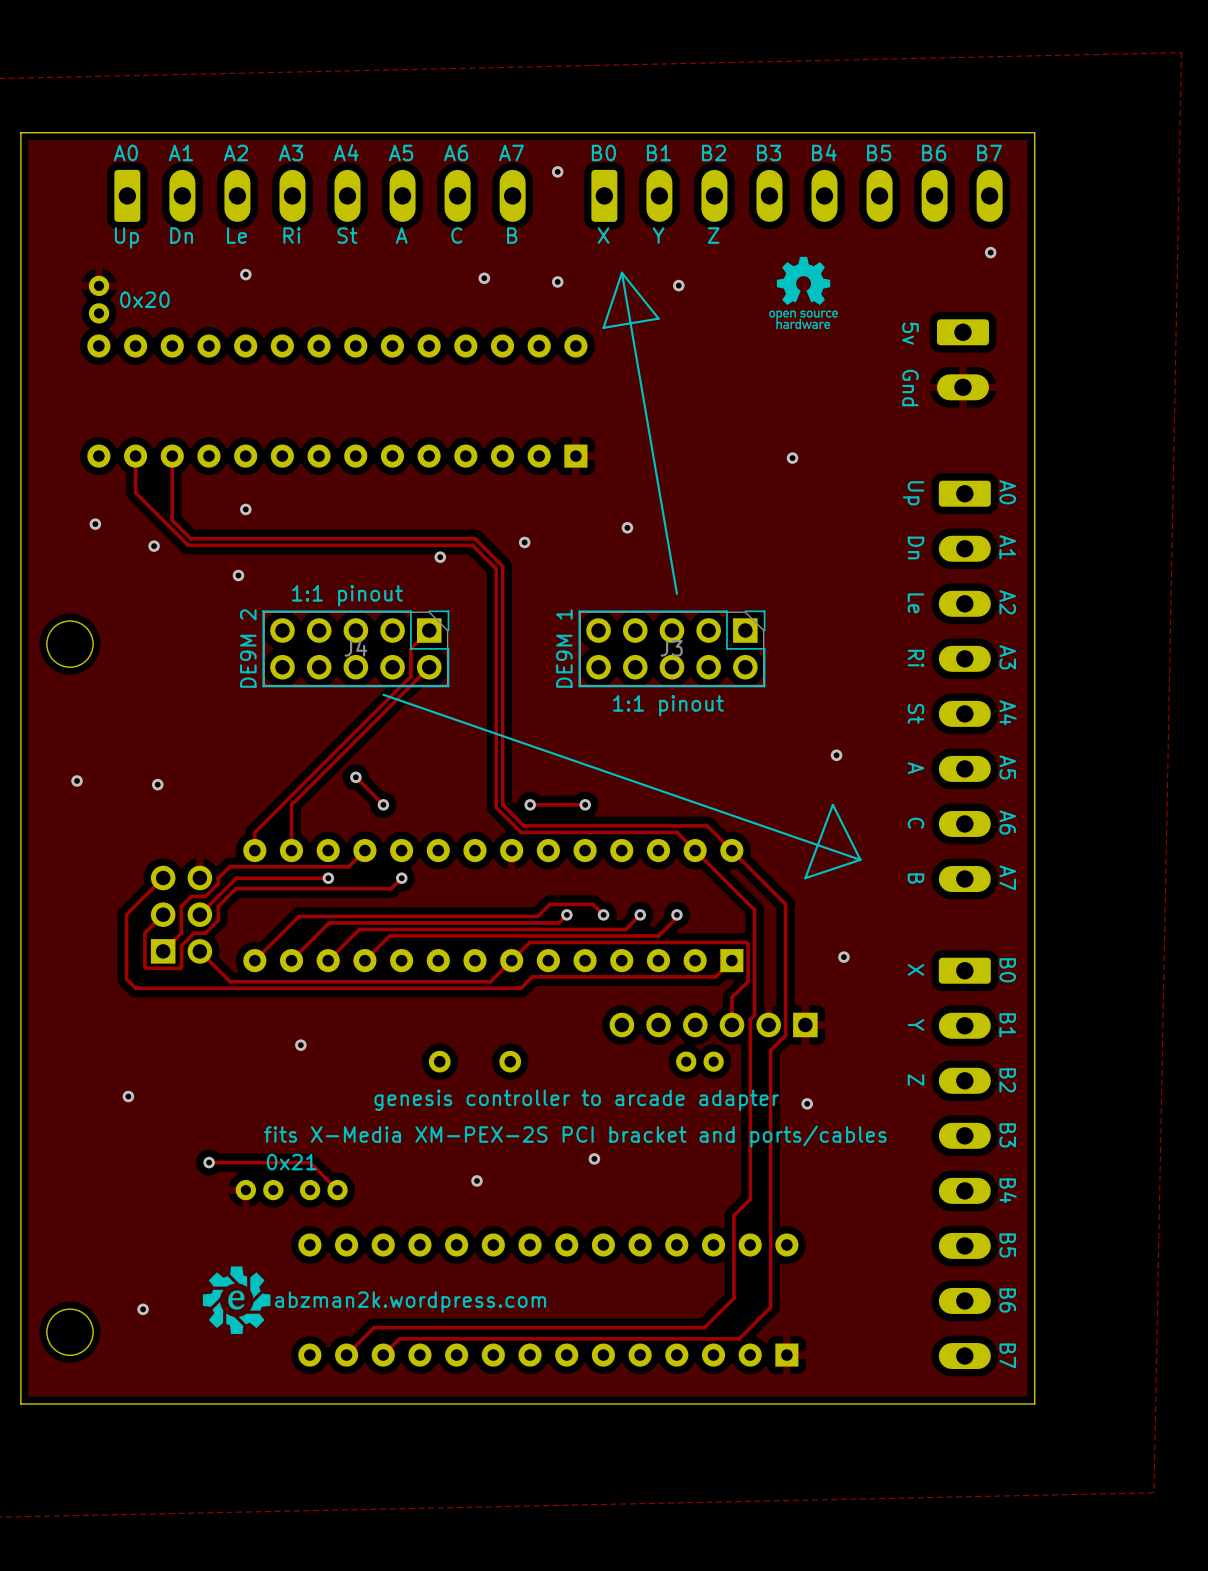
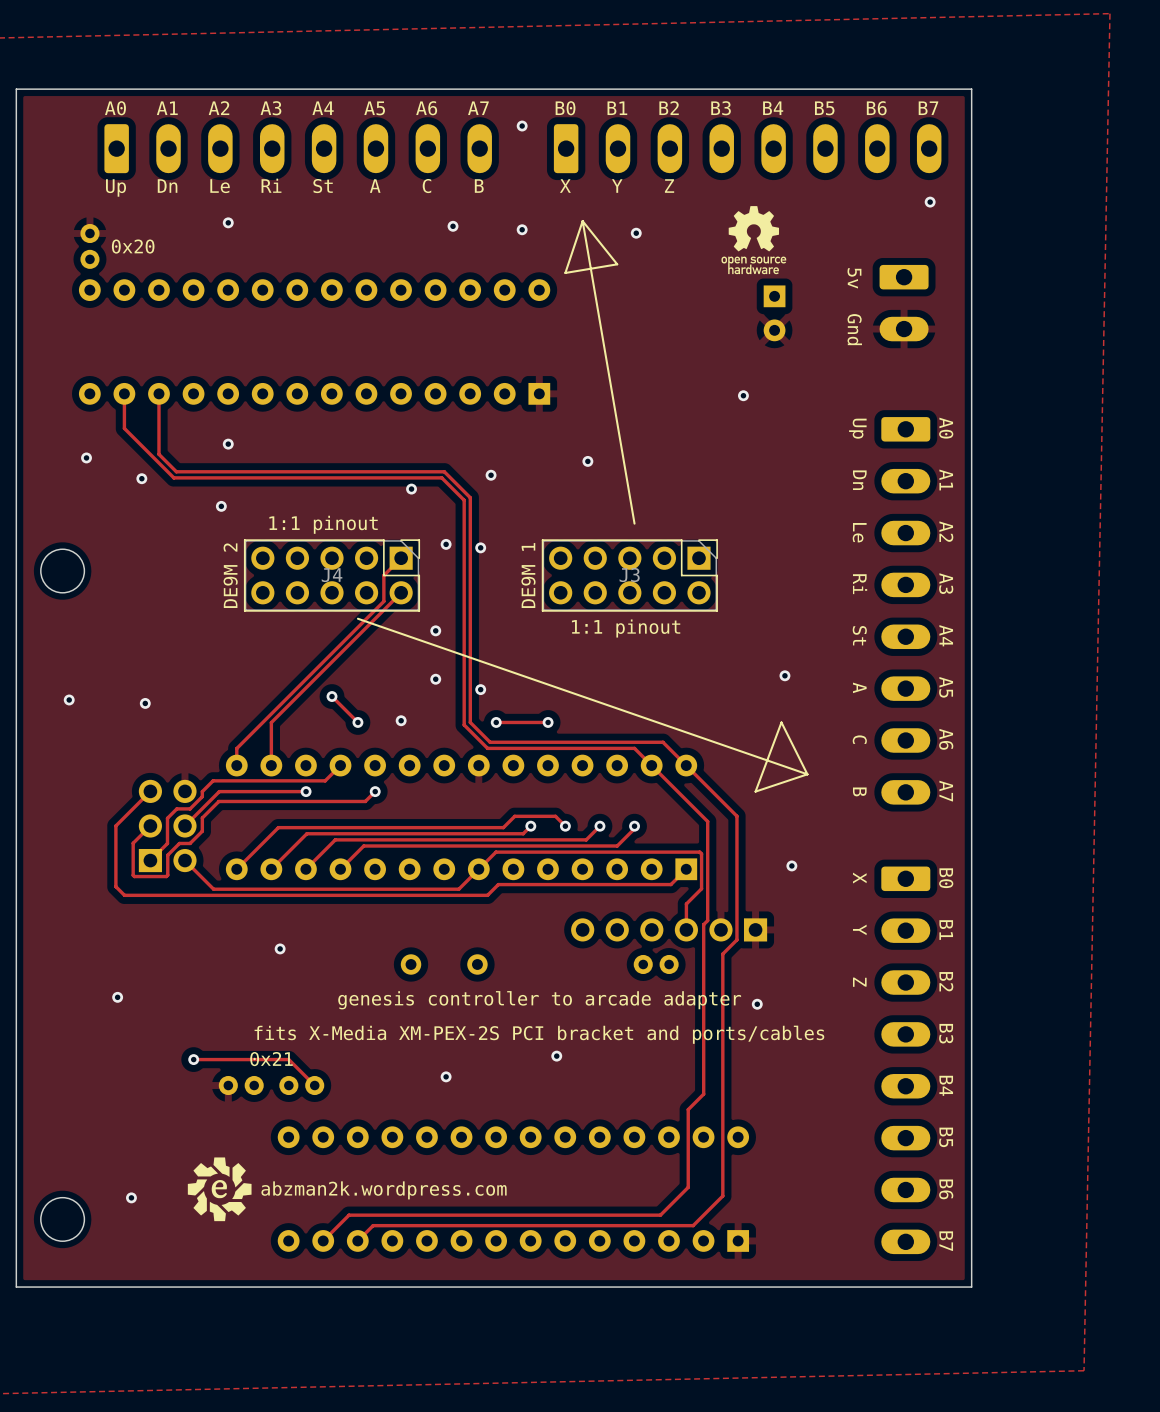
part: none -> (774, 313)
via: none -> (446, 544)
via: none -> (480, 547)
via: none -> (435, 630)
via: none -> (435, 679)
via: none -> (480, 689)
via: none -> (401, 720)

